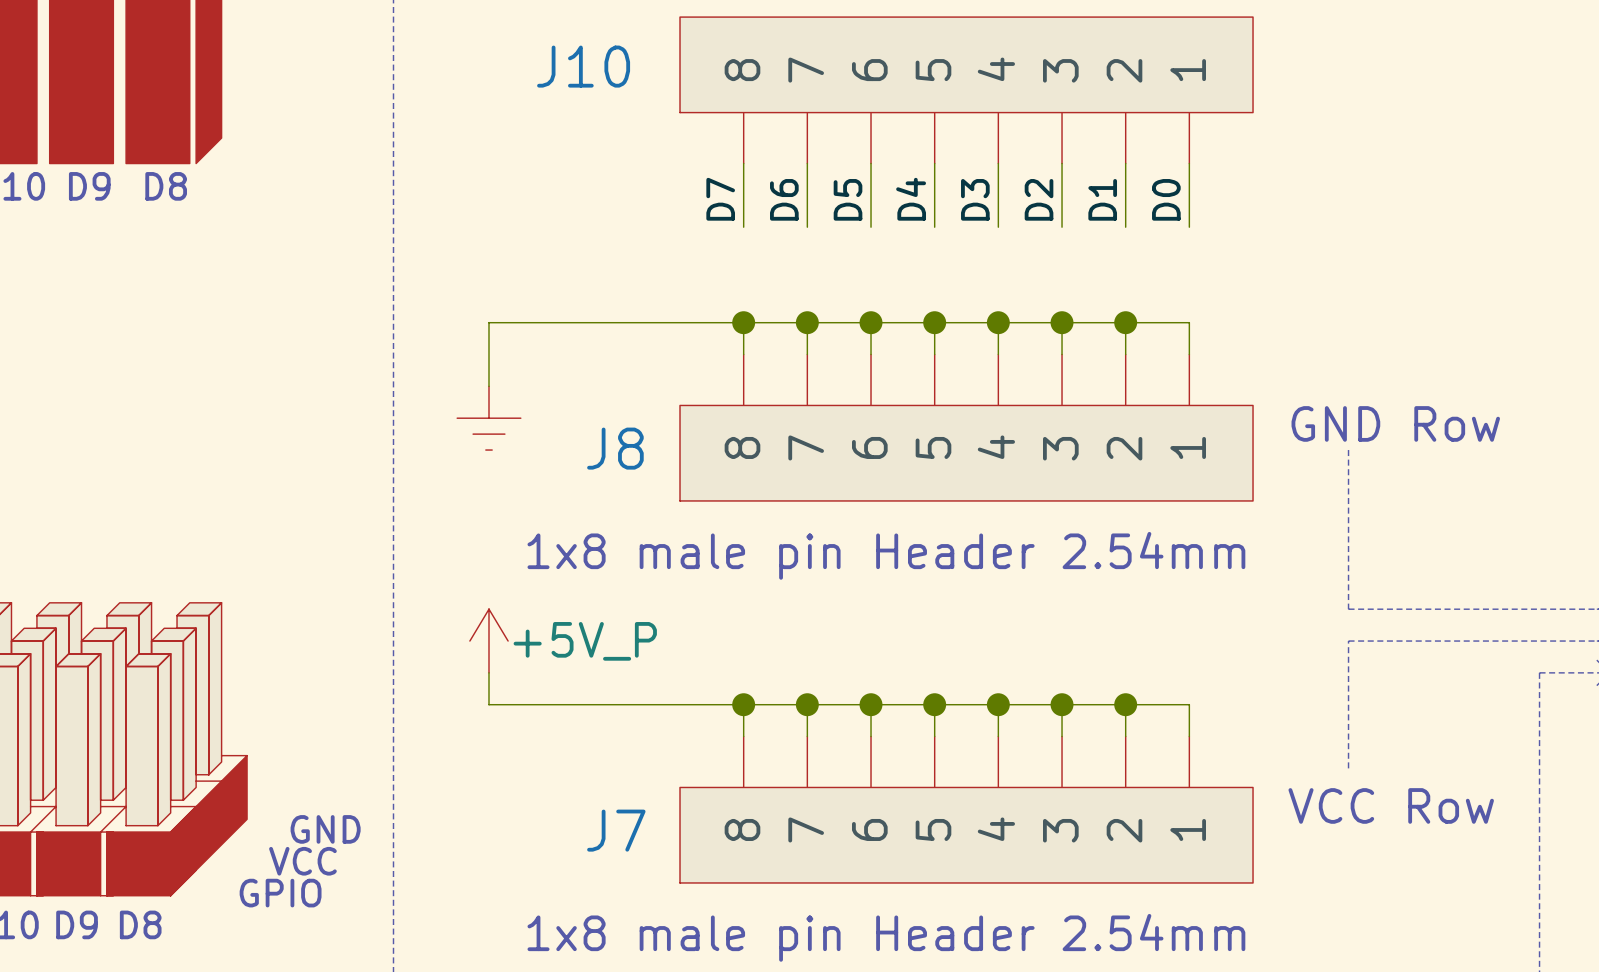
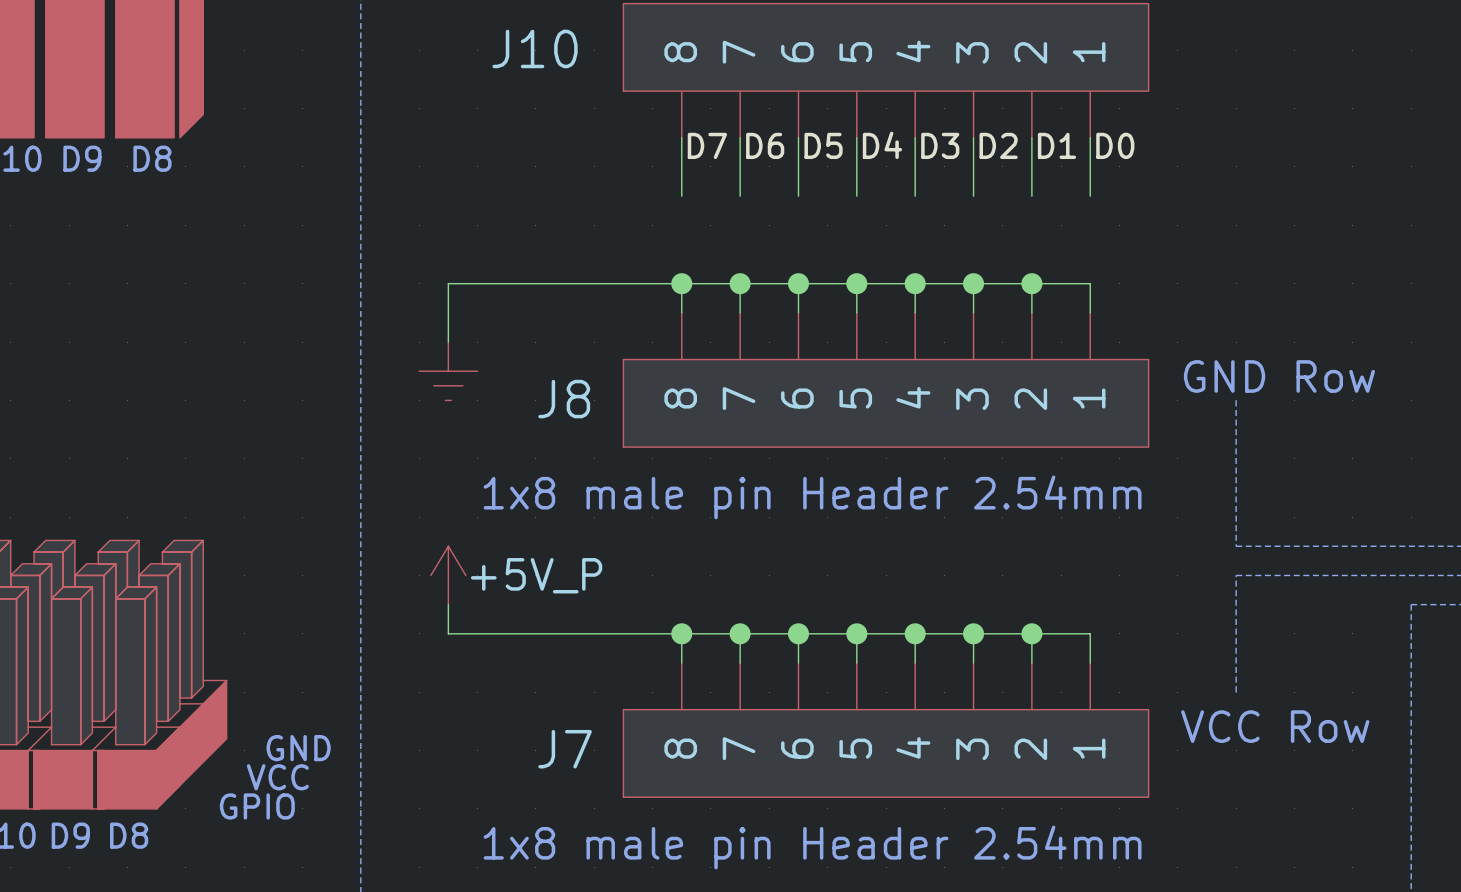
label rotation: 0° (720, 199) -> 90° clockwise (707, 145)
label rotation: 0° (784, 199) -> 90° clockwise (765, 145)
label rotation: 0° (848, 199) -> 90° clockwise (823, 145)
label rotation: 0° (911, 199) -> 90° clockwise (882, 145)
label rotation: 0° (975, 199) -> 90° clockwise (940, 145)
label rotation: 0° (1039, 199) -> 90° clockwise (998, 145)
label rotation: 0° (1102, 199) -> 90° clockwise (1056, 145)
label rotation: 0° (1166, 199) -> 90° clockwise (1115, 145)

